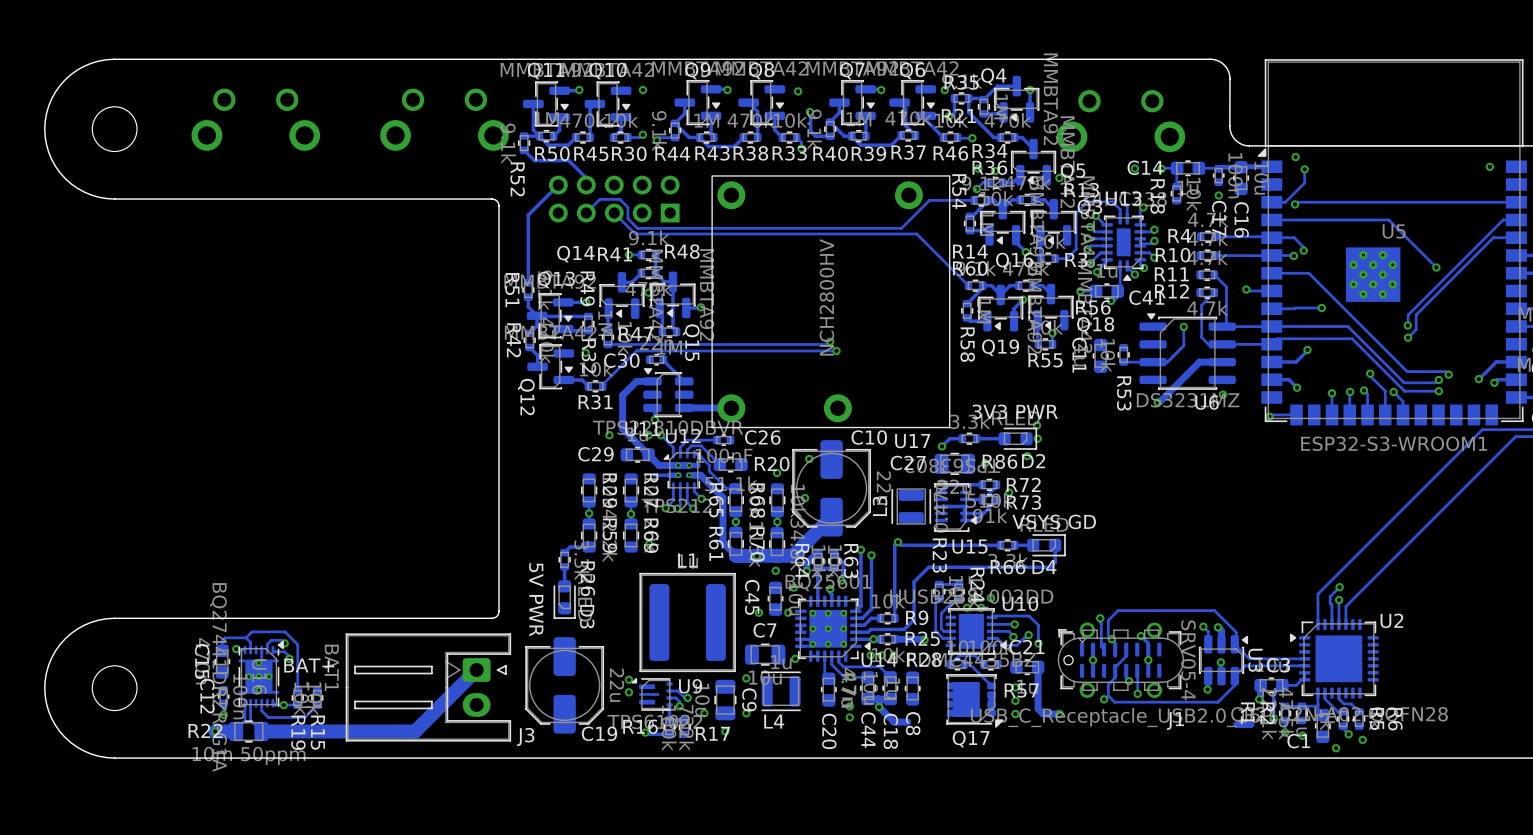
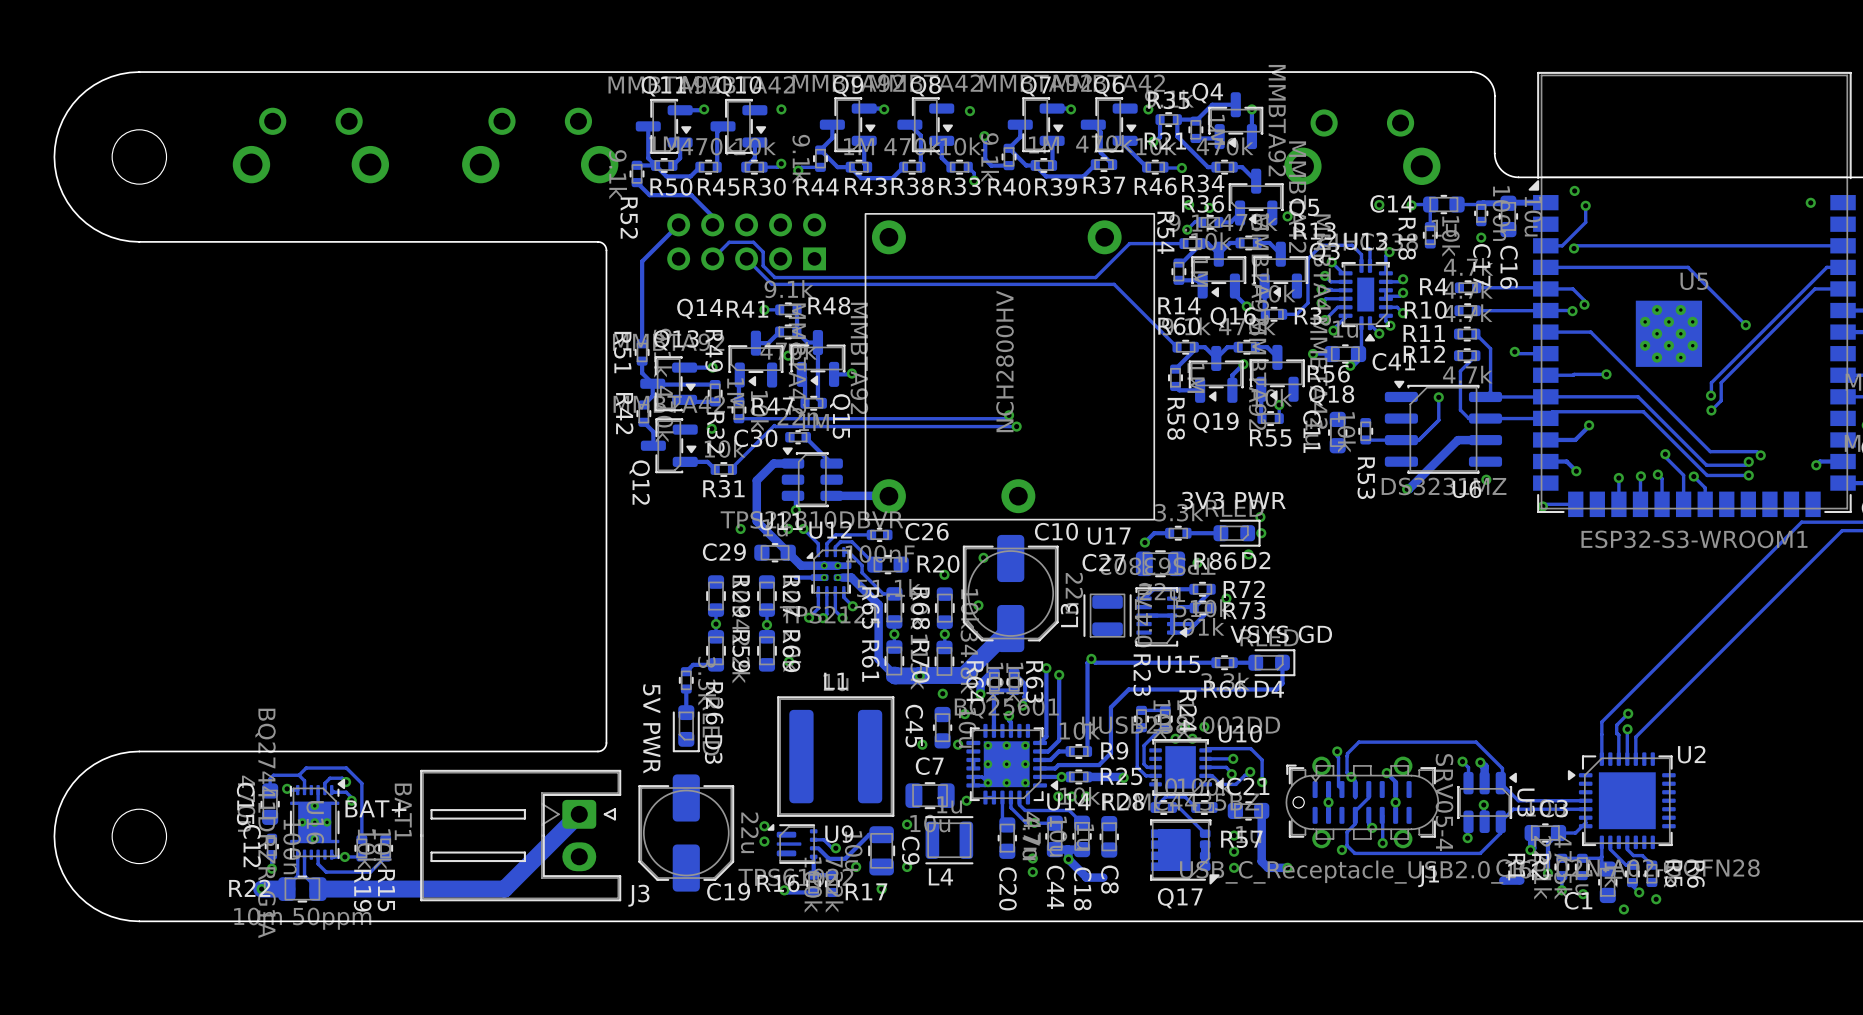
track: (1516, 361) (1496, 361) (1478, 379) -> none
via: (1478, 379) -> none
track: (673, 697) (679, 701) (679, 706) -> (818, 848) (828, 858) (845, 858) (869, 834) (881, 834)
via: (679, 706) -> none

